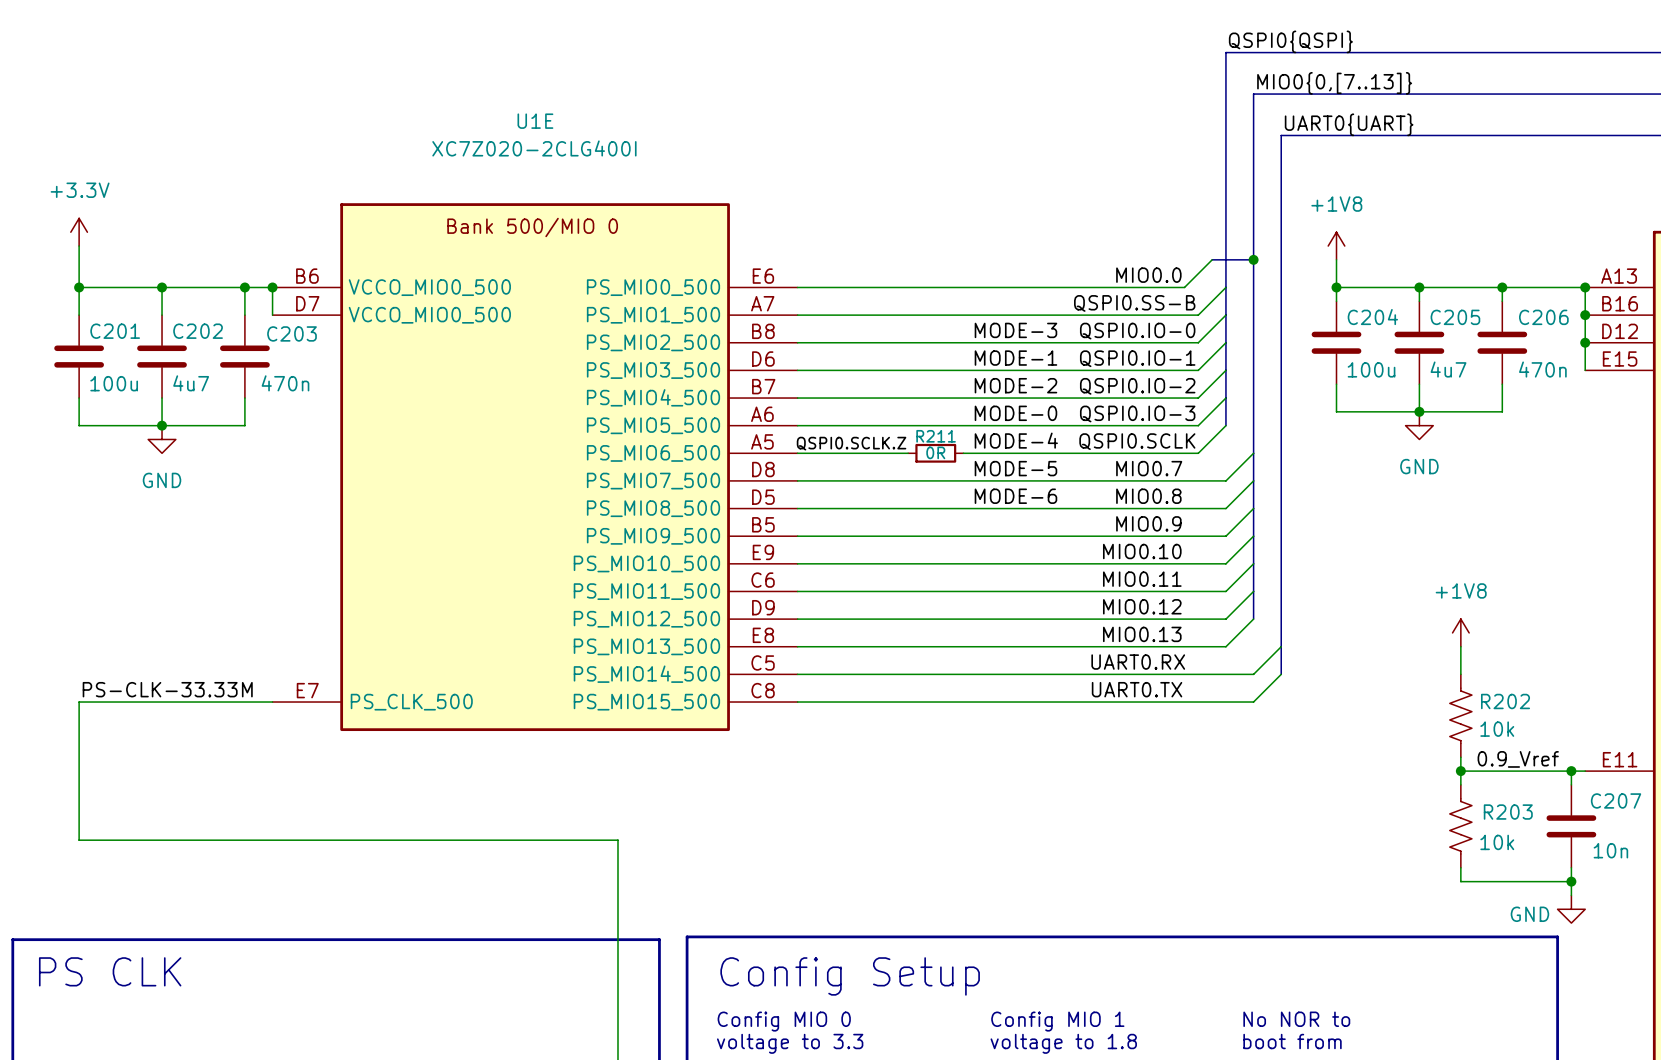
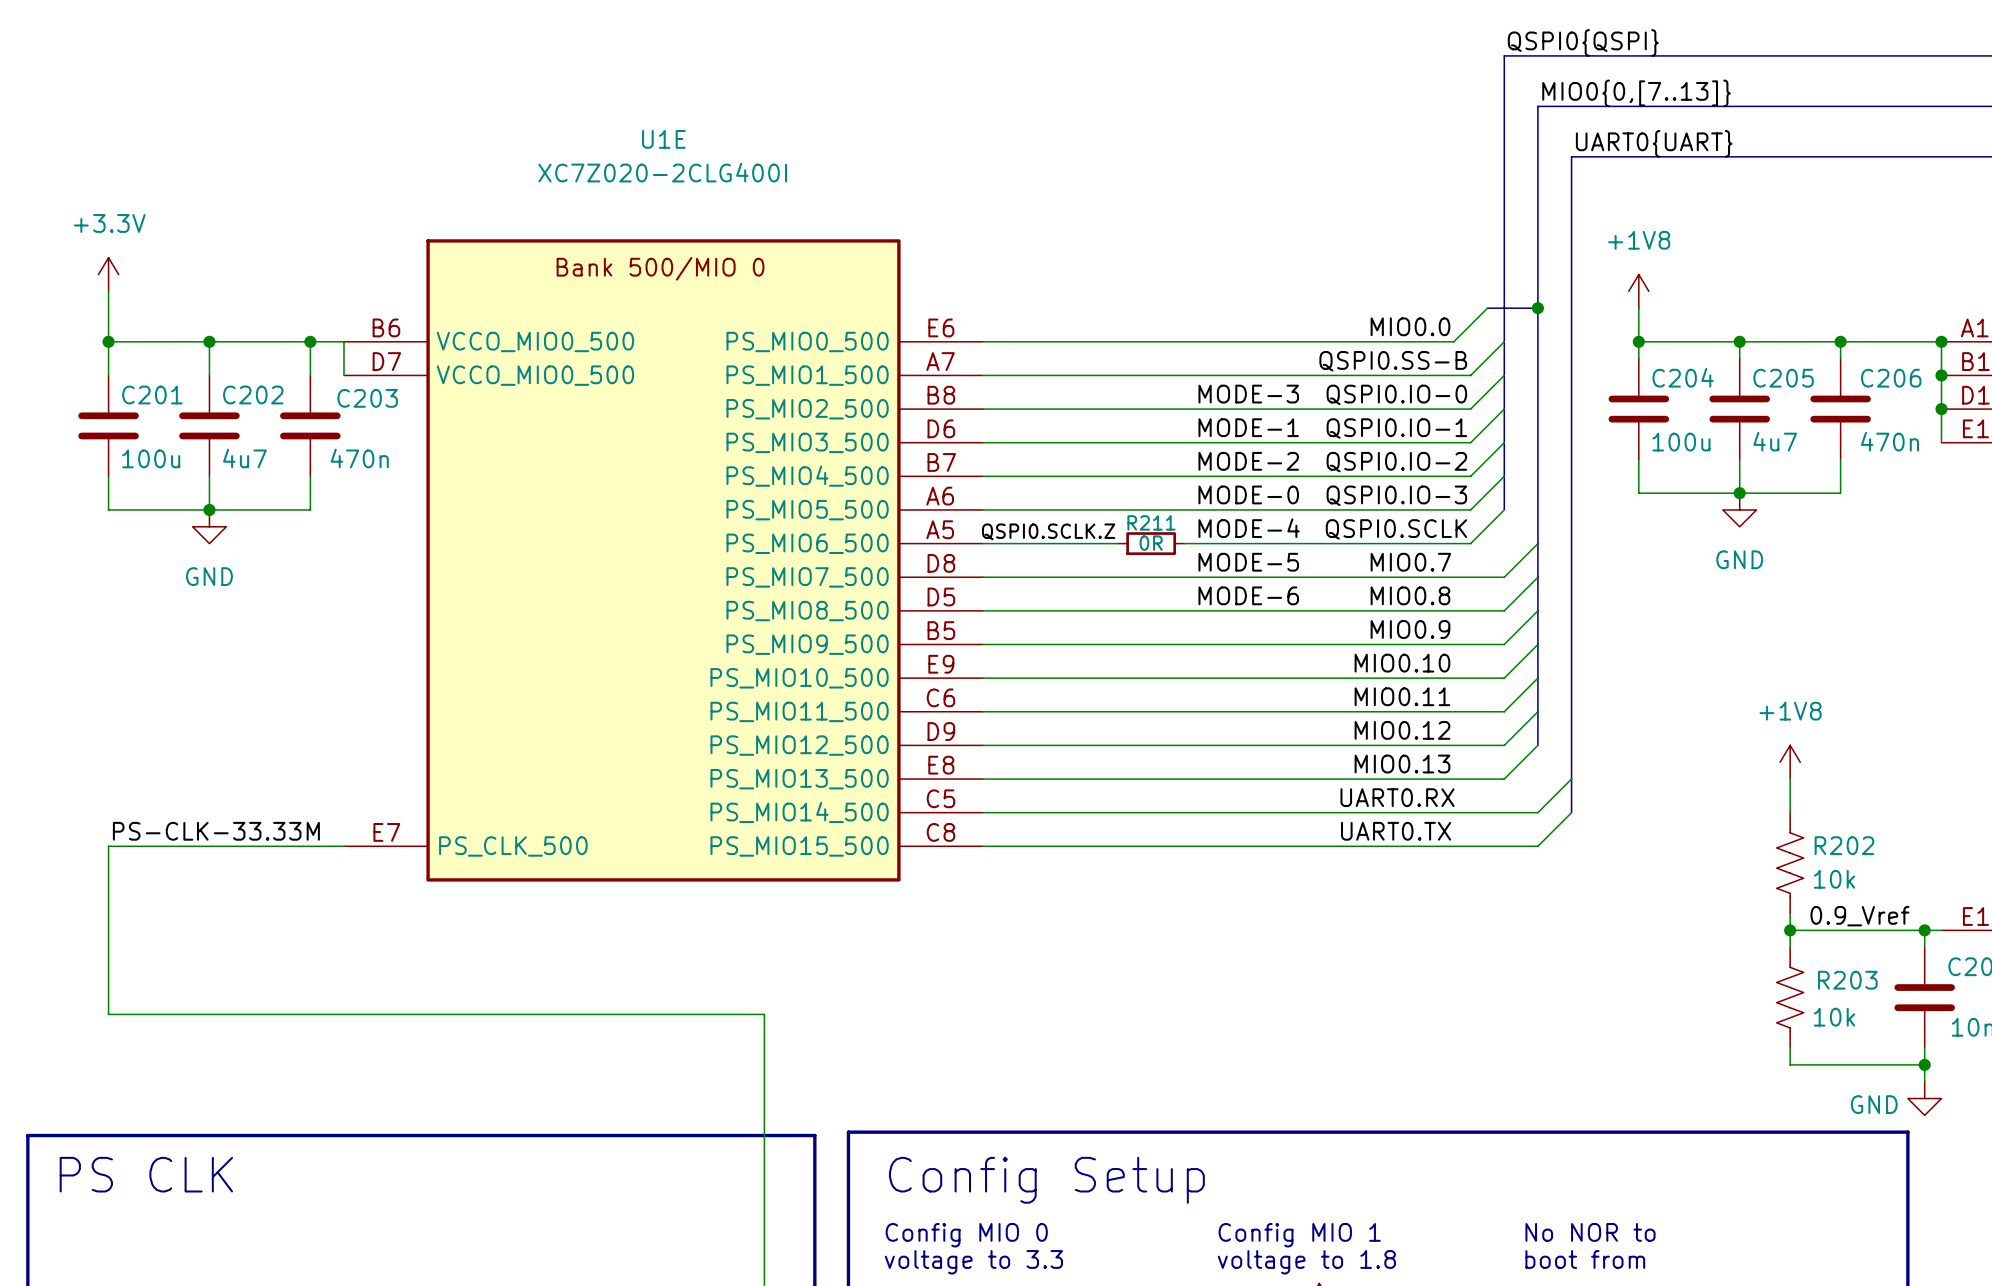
junction: (272, 287) -> none

